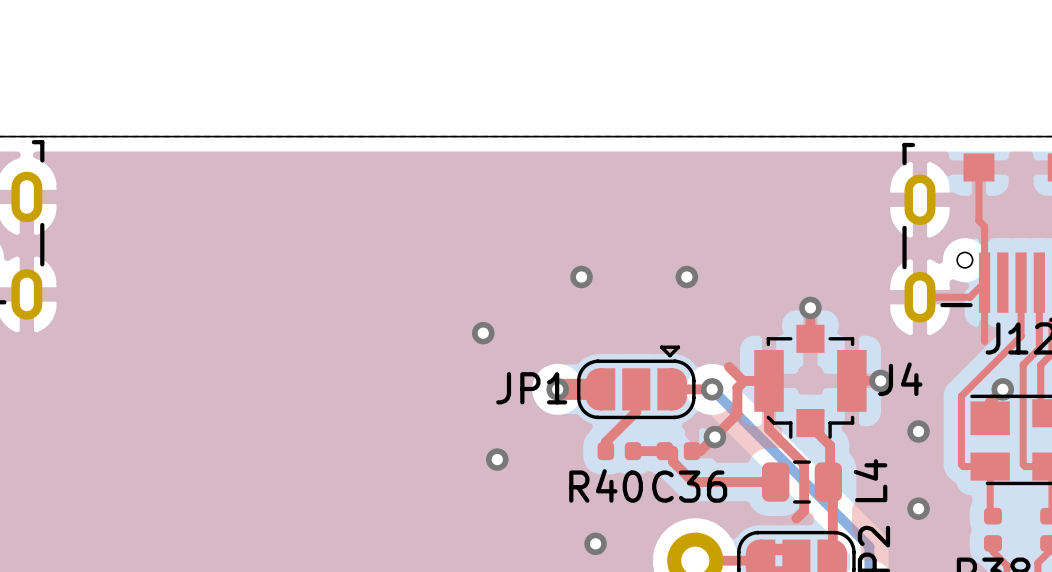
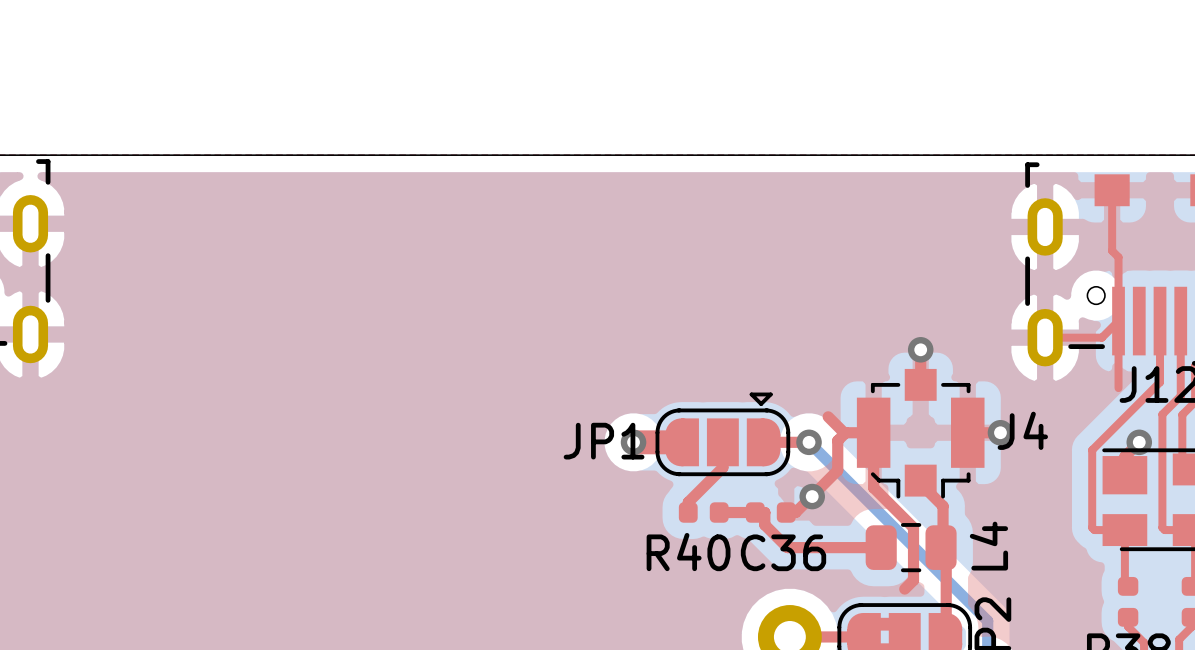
via: (581, 277) -> none
via: (686, 277) -> none
via: (483, 333) -> none
via: (918, 431) -> none
via: (497, 459) -> none
via: (918, 508) -> none
via: (595, 543) -> none

